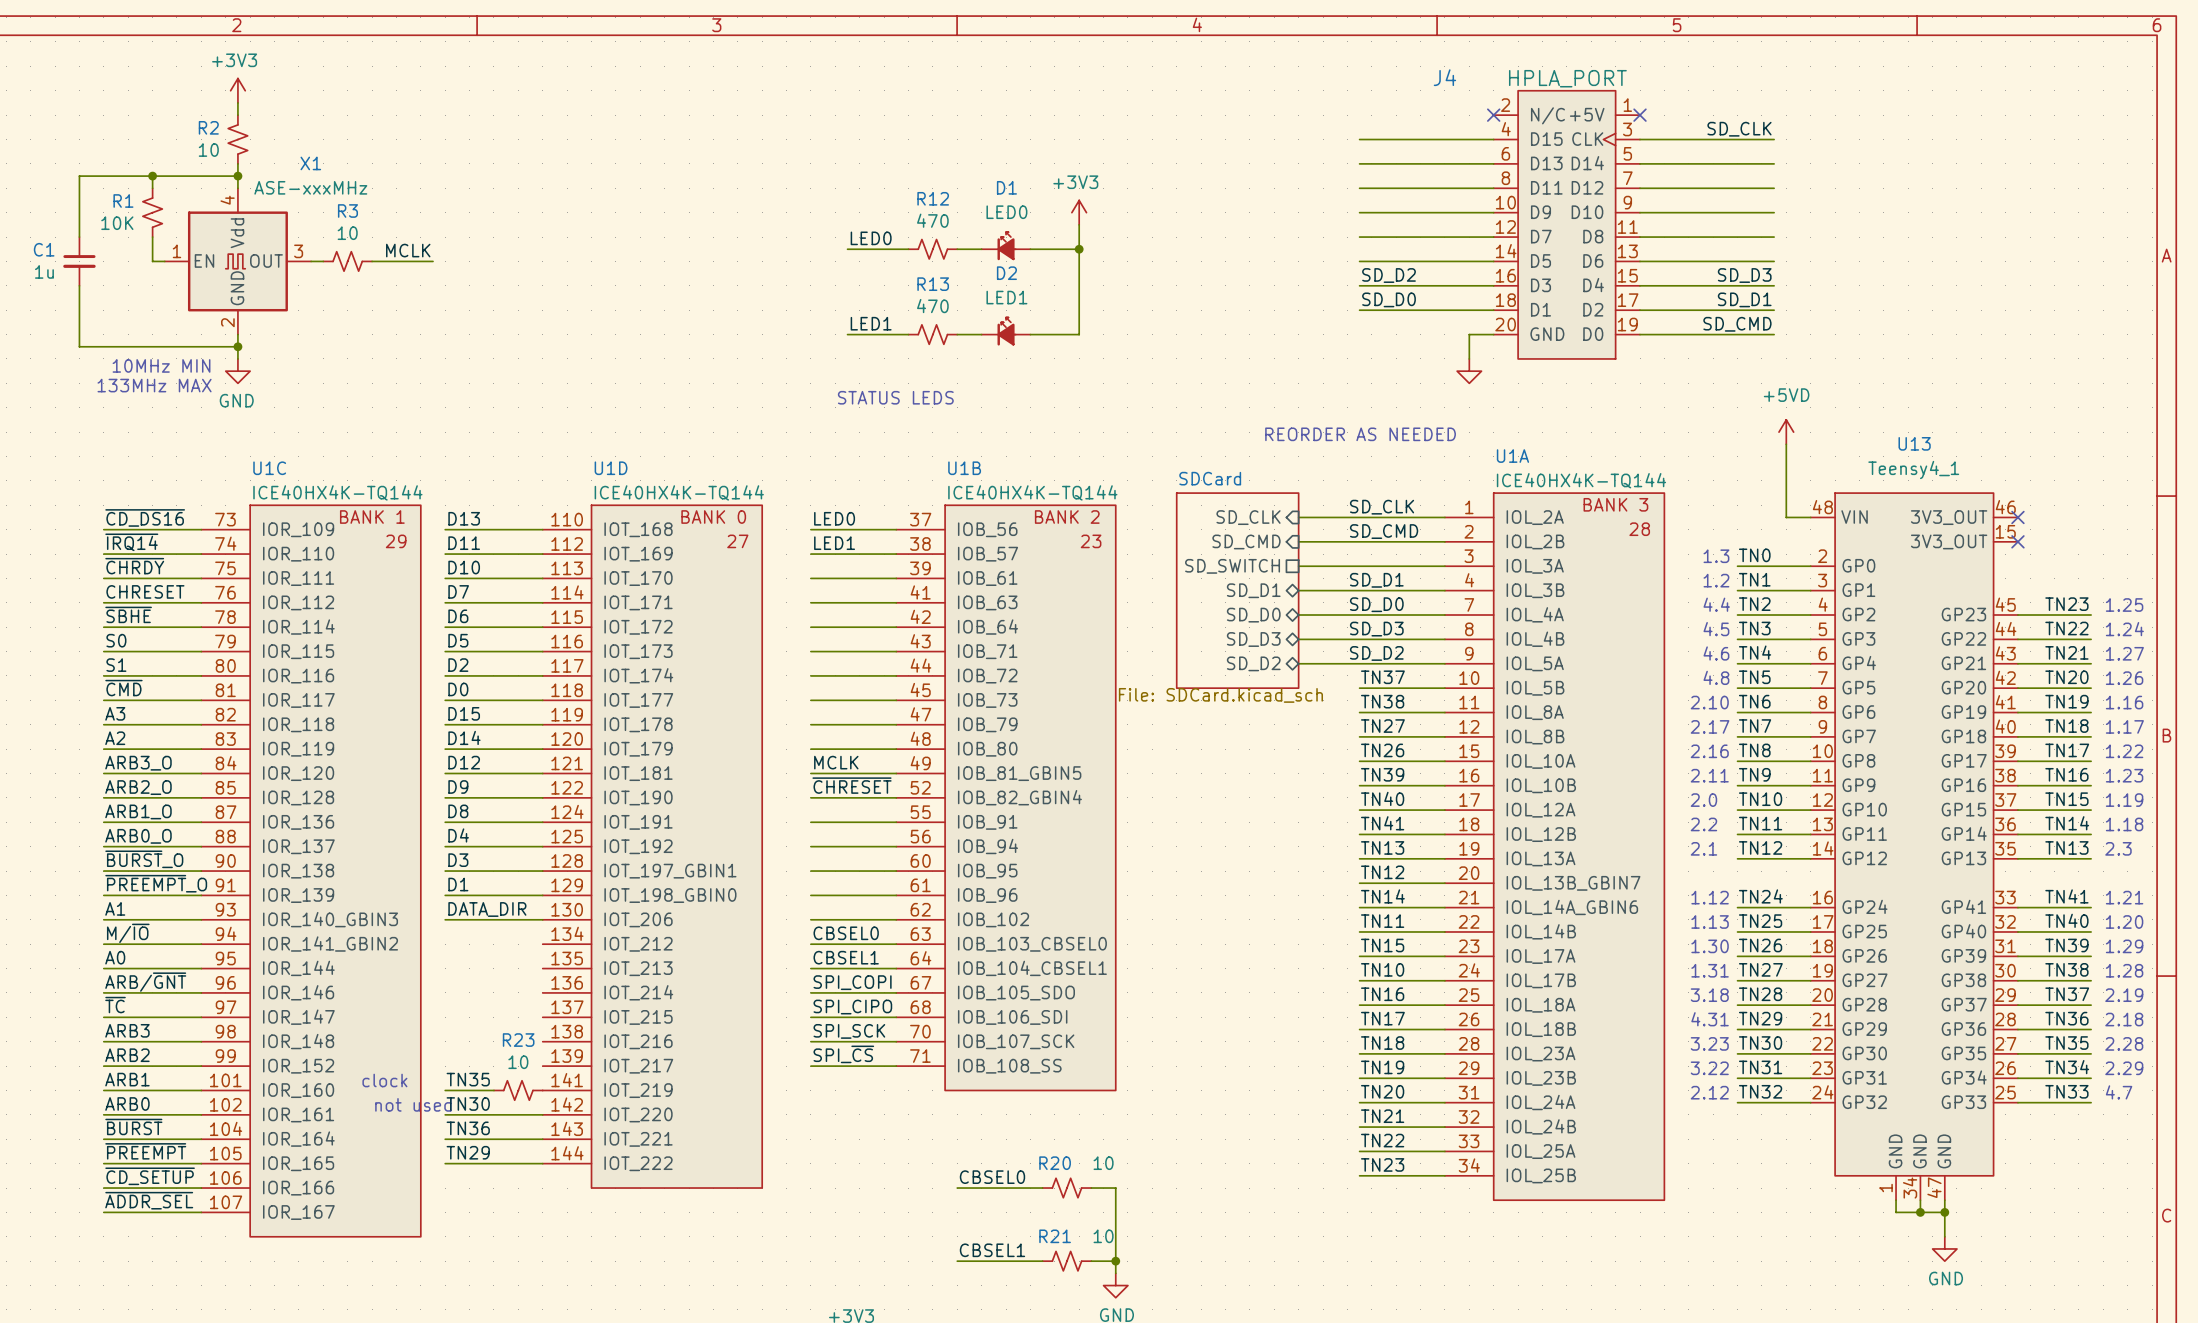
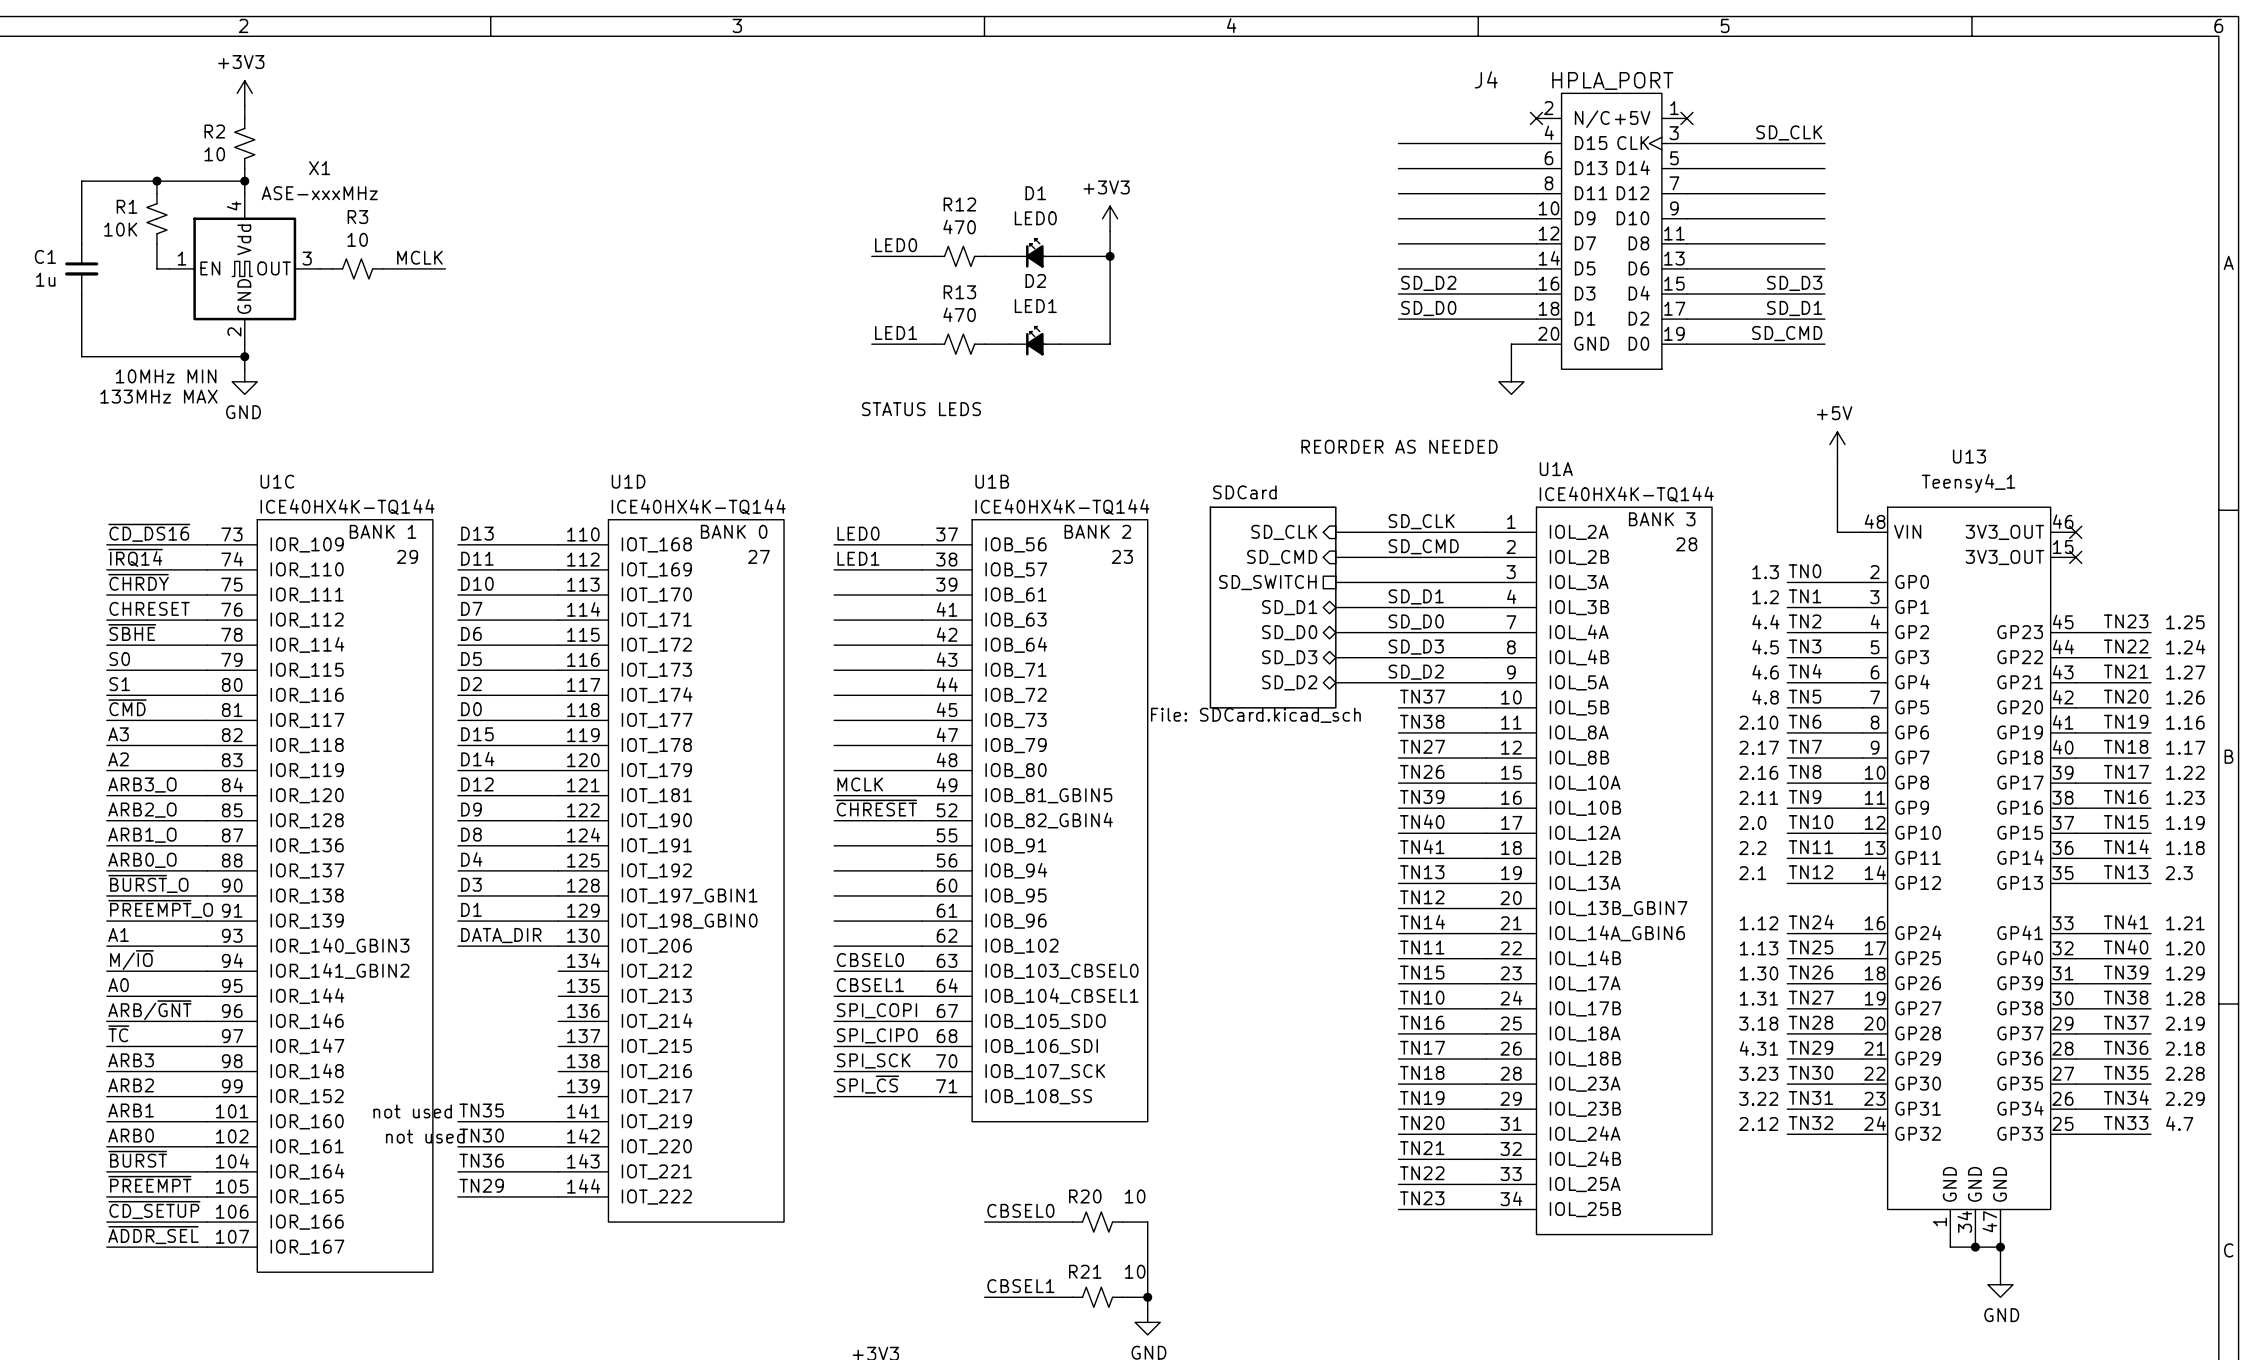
power symbol: +5VD (1786, 432) -> +5V (1837, 444)
text: clock (384, 1080) -> not used (412, 1111)
R23: 10 (518, 1090) -> none

